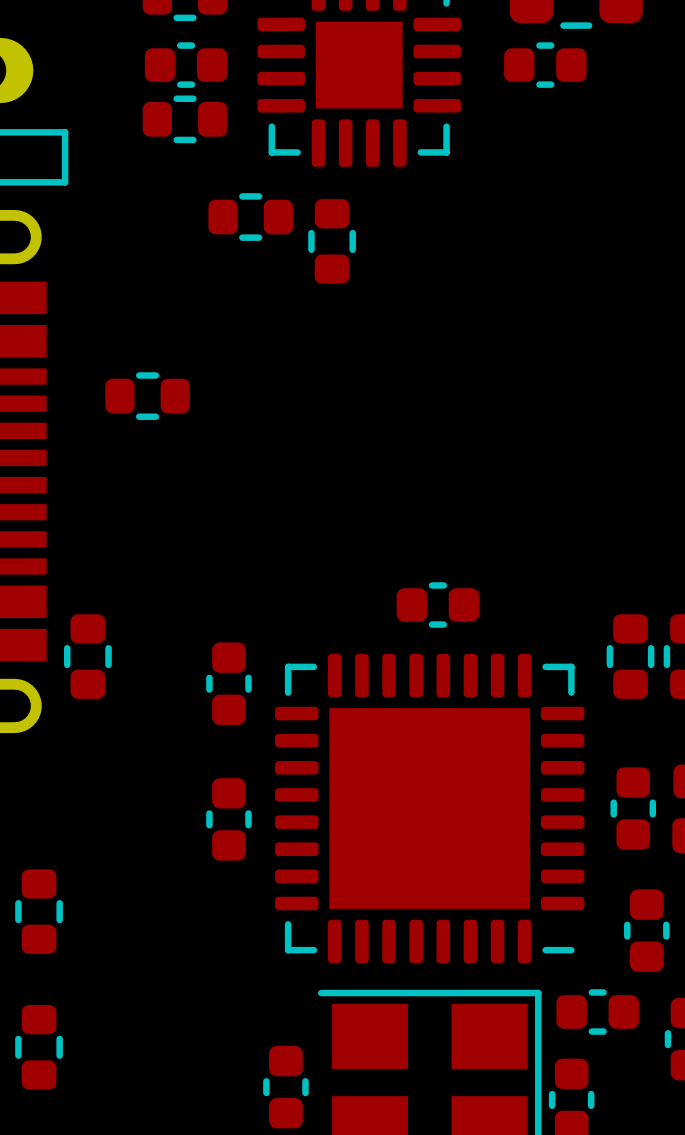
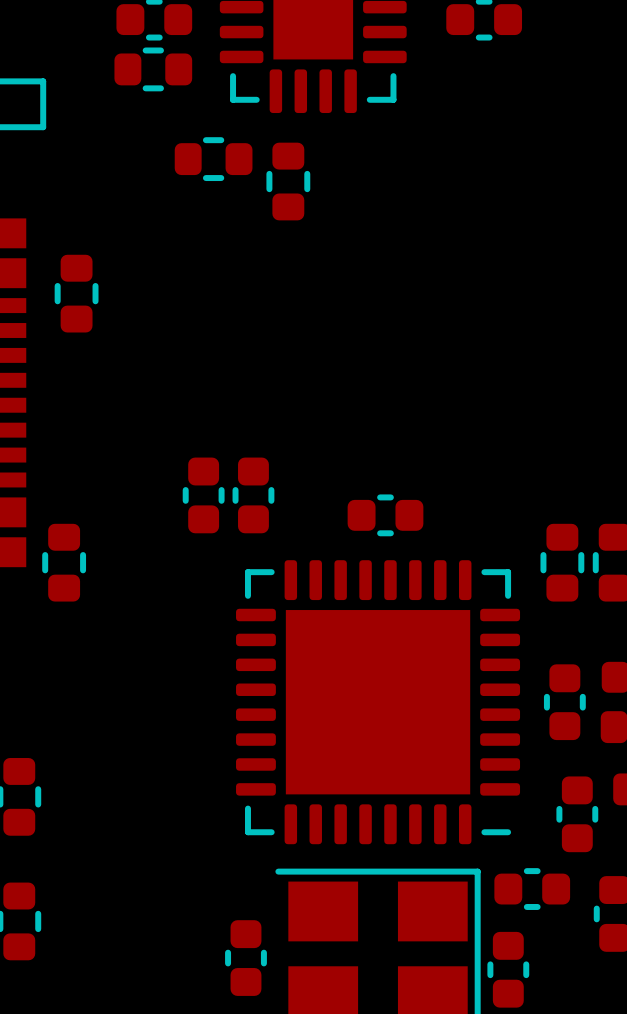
part rotation: 0° (147, 396) -> 90° clockwise (76, 293)
part position: (147, 396) -> (76, 293)
part: none -> (203, 495)
part: none -> (253, 495)
part: (228, 683) -> none
part: (228, 819) -> none

